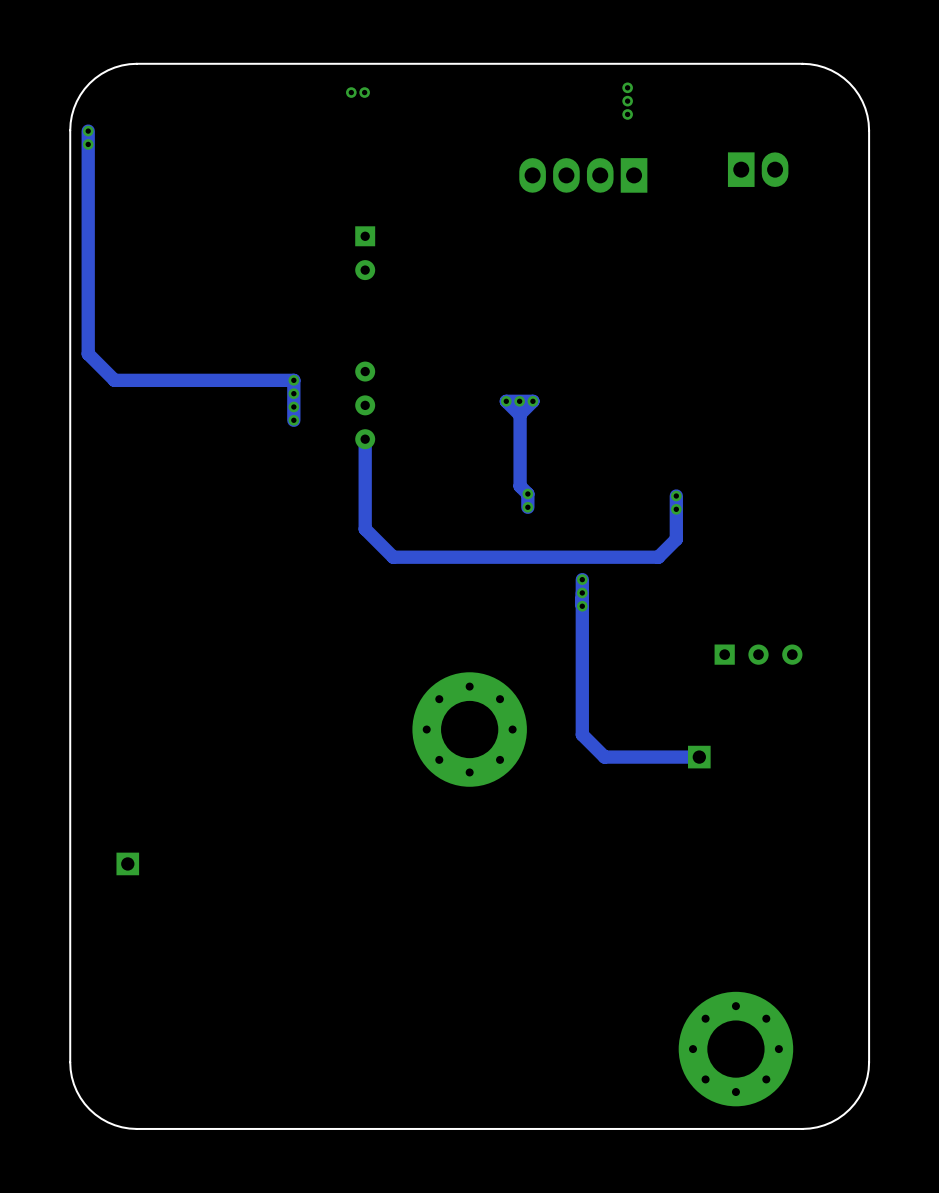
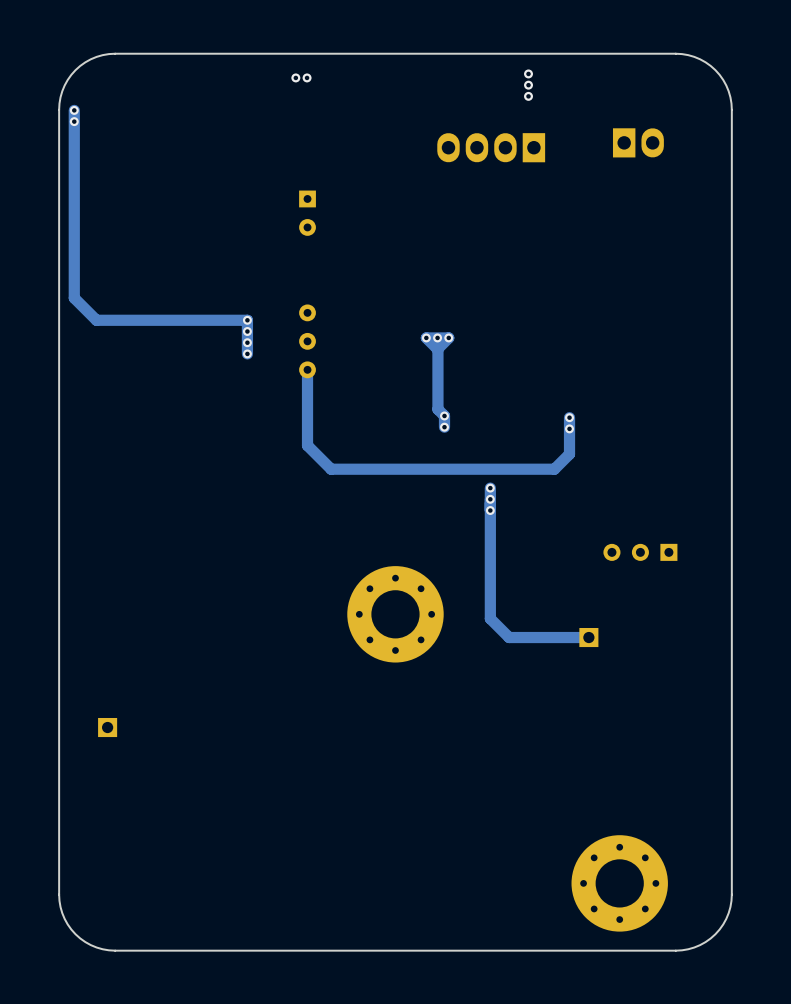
part rotation: 0° (758, 654) -> 180° (640, 552)

